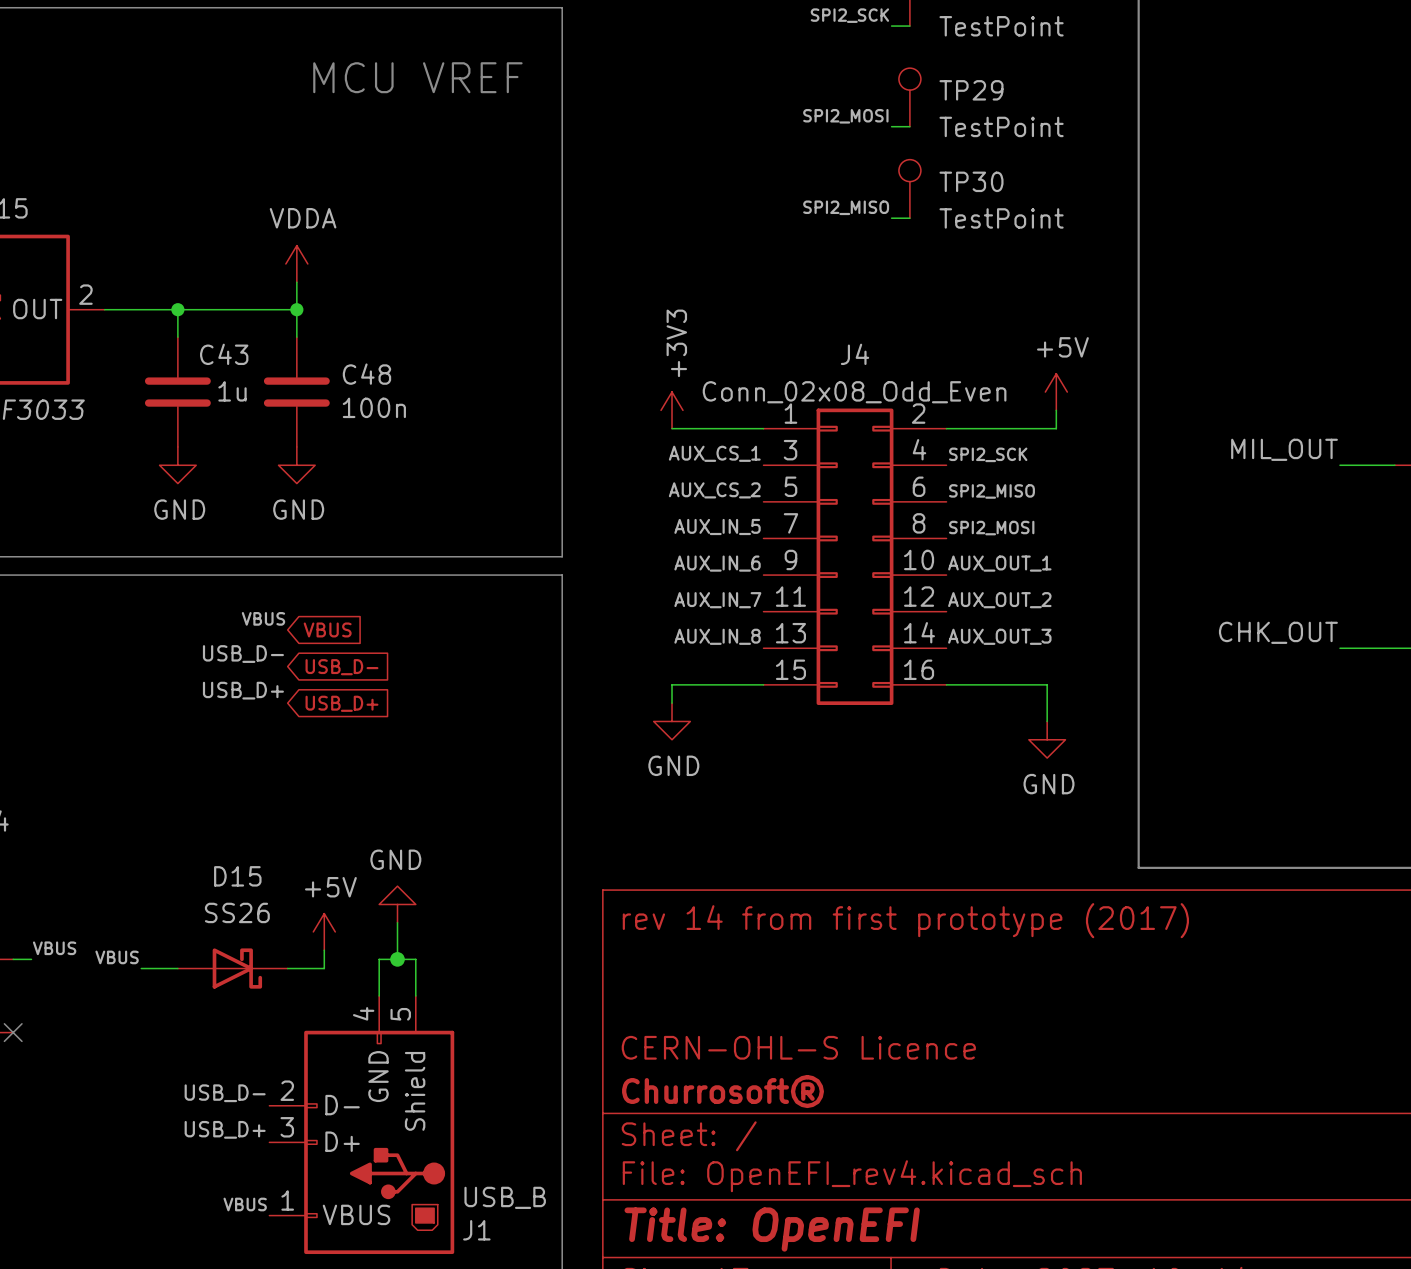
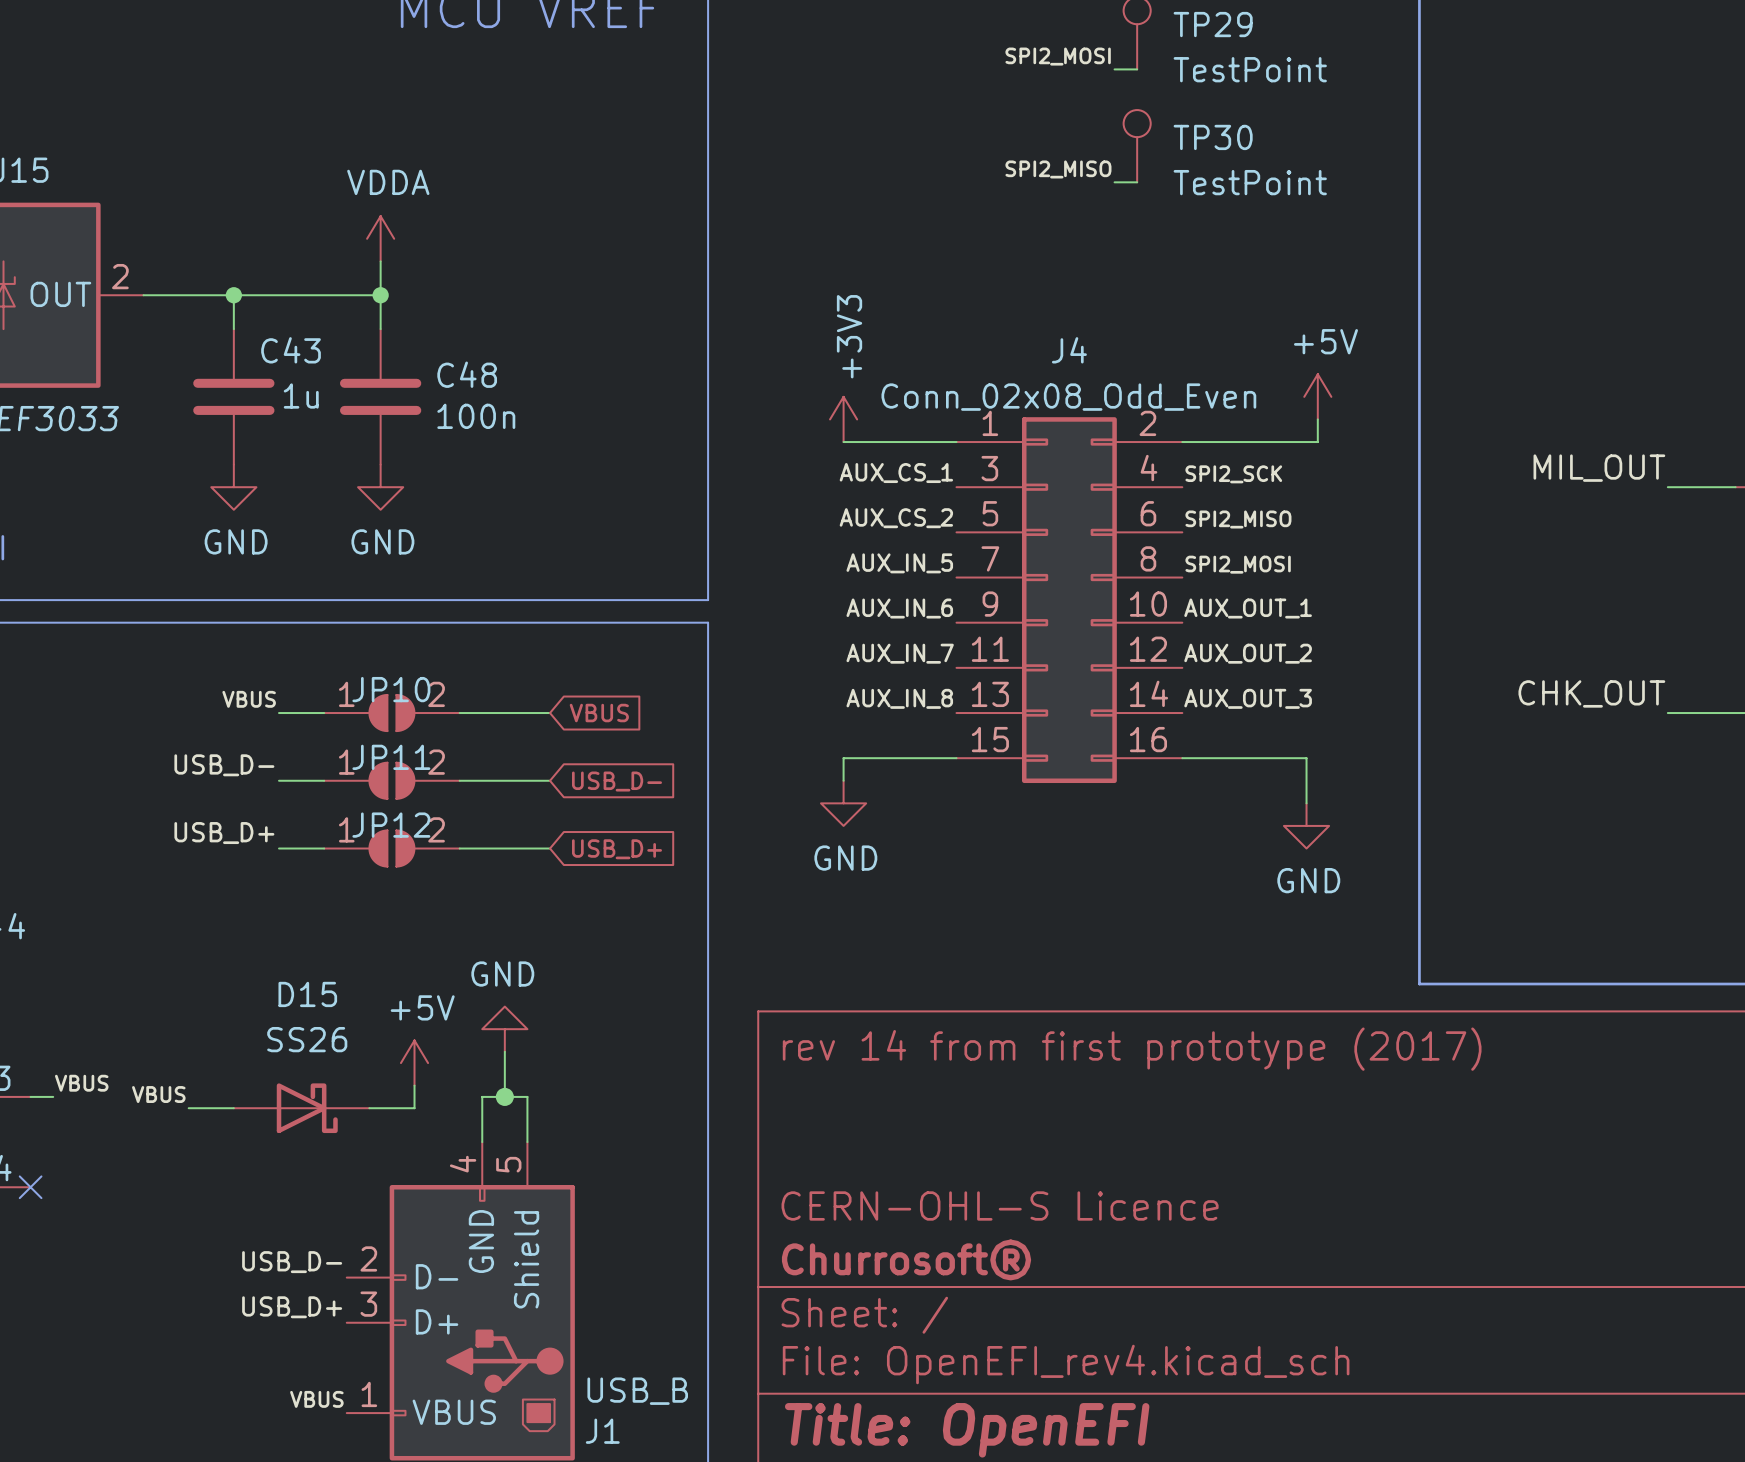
label position: VBUS (263, 618) -> VBUS (249, 699)
global label position: VBUS (327, 629) -> VBUS (599, 713)
wire: none -> (279, 713) (324, 713)
JP10: none -> (391, 713)
wire: none -> (459, 713) (550, 713)
label position: USB_D- (243, 654) -> USB_D- (224, 765)
global label position: USB_D- (341, 667) -> USB_D- (617, 781)
label position: USB_D+ (243, 690) -> USB_D+ (224, 833)
wire: none -> (279, 780) (324, 780)
JP11: none -> (391, 780)
global label position: USB_D+ (341, 703) -> USB_D+ (617, 849)
wire: none -> (459, 780) (550, 780)
wire: none -> (279, 848) (324, 848)
JP12: none -> (391, 848)
wire: none -> (459, 848) (550, 848)

